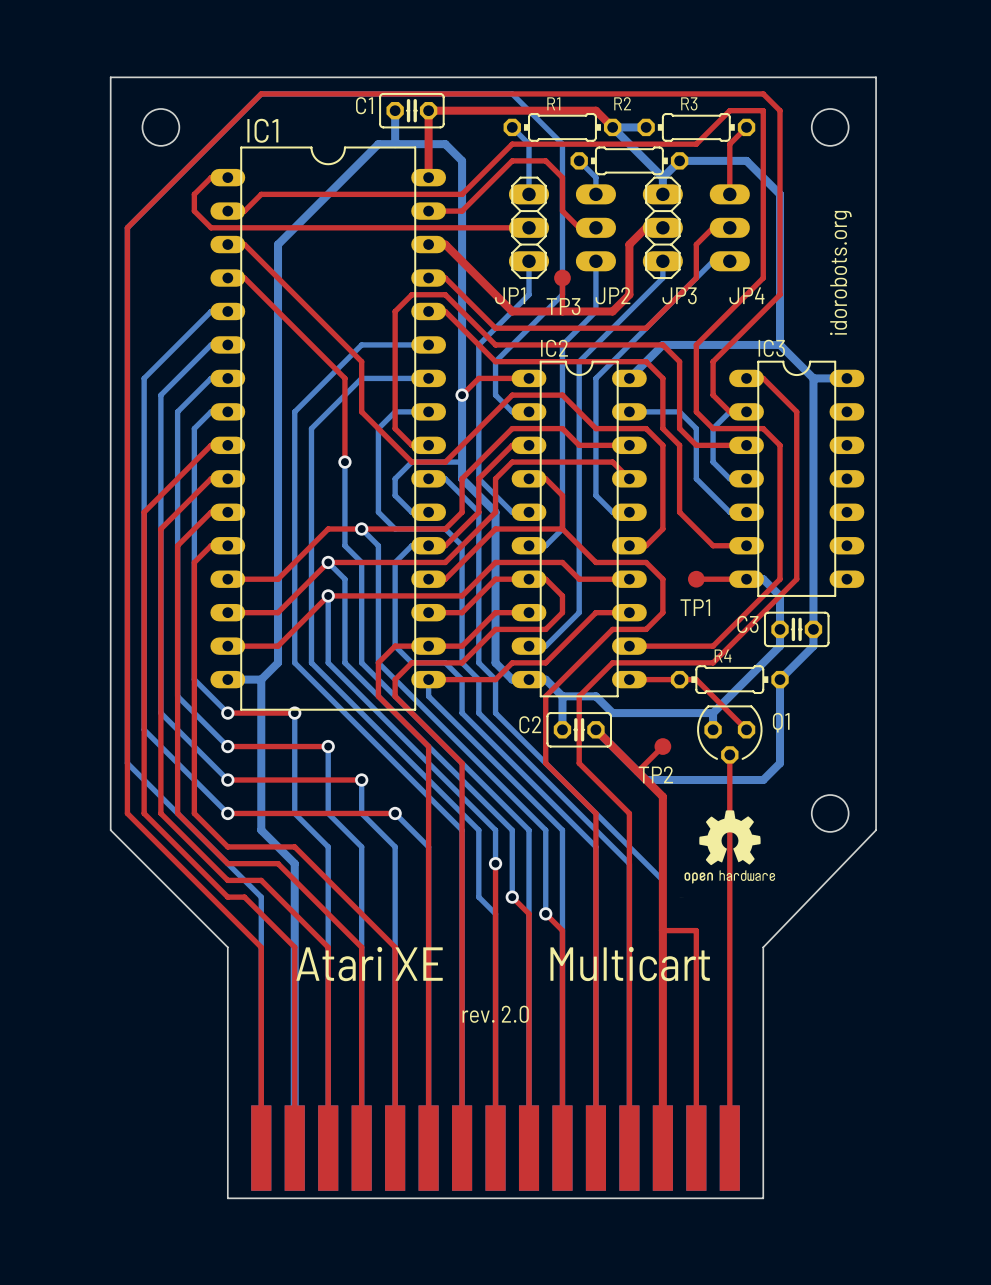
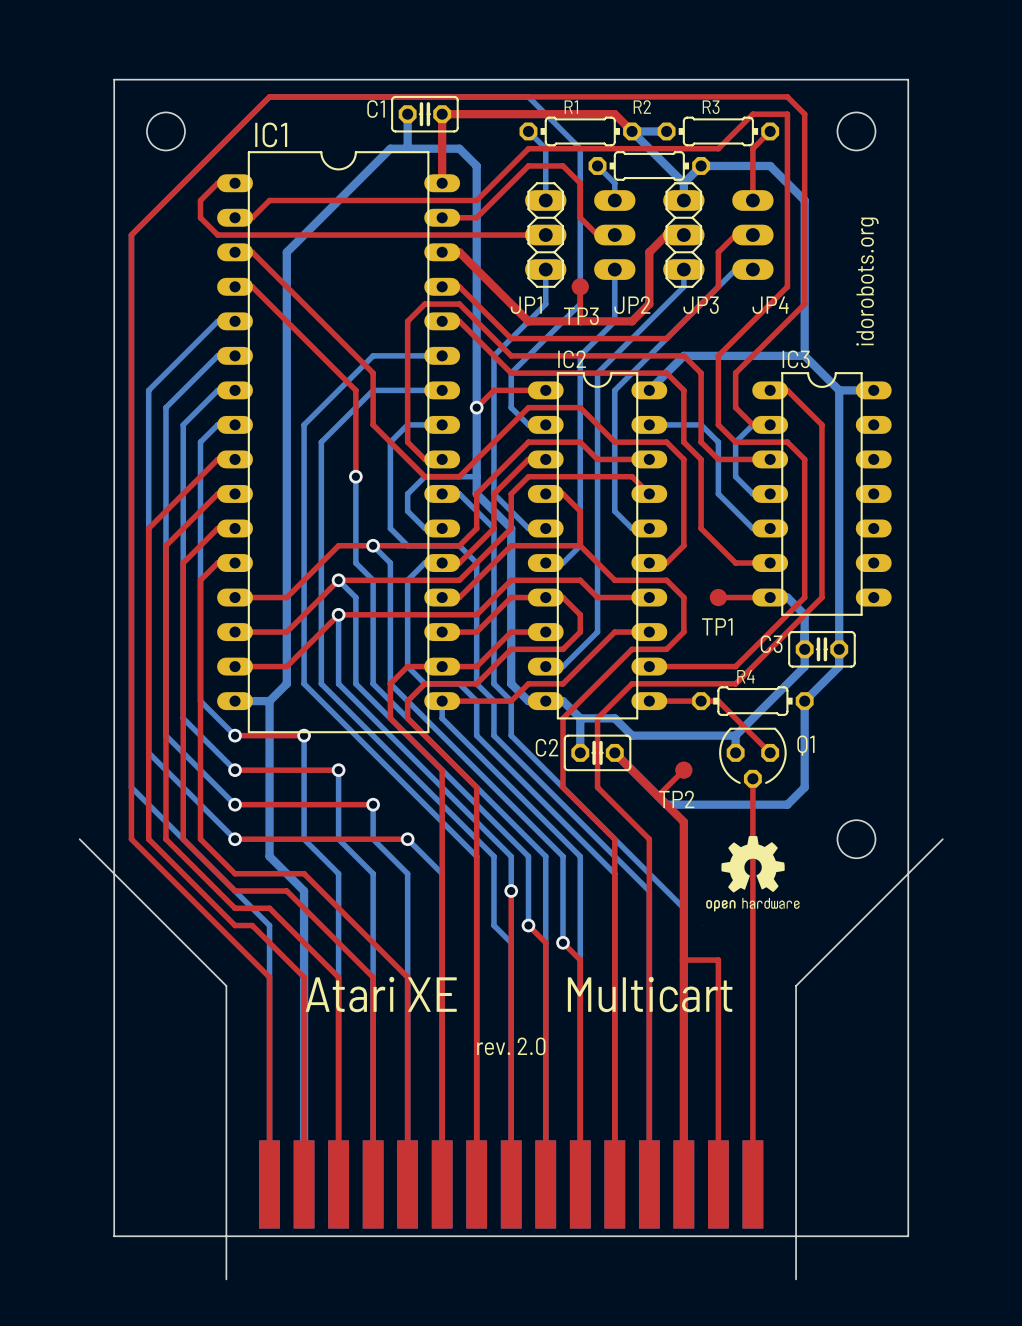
board edge: (110, 77) (876, 77) (876, 830) (763, 947) (763, 1198) -> (114, 79) (908, 79) (908, 1236) (787, 1236)
board edge: none -> (79, 839) (226, 985) (226, 1279)
board edge: none -> (942, 839) (796, 985) (796, 1279)
board edge: (110, 830) (227, 947) (227, 1198) -> (114, 856) (114, 1236) (235, 1236)

